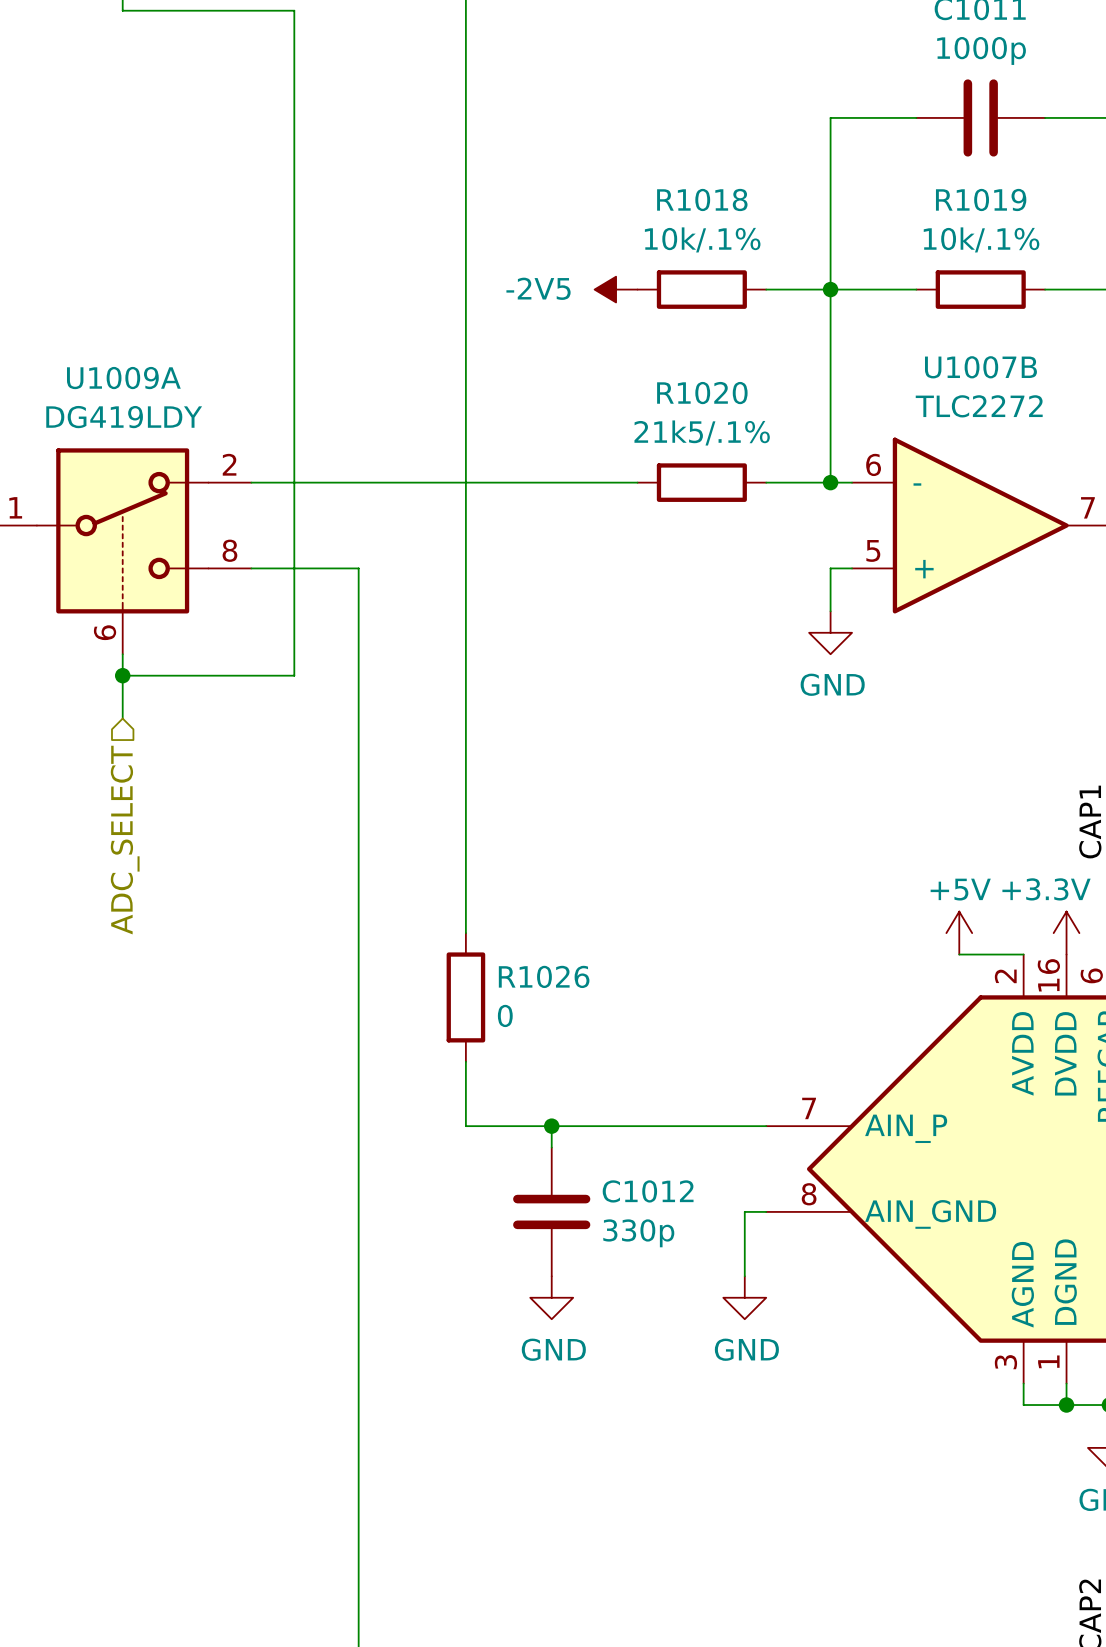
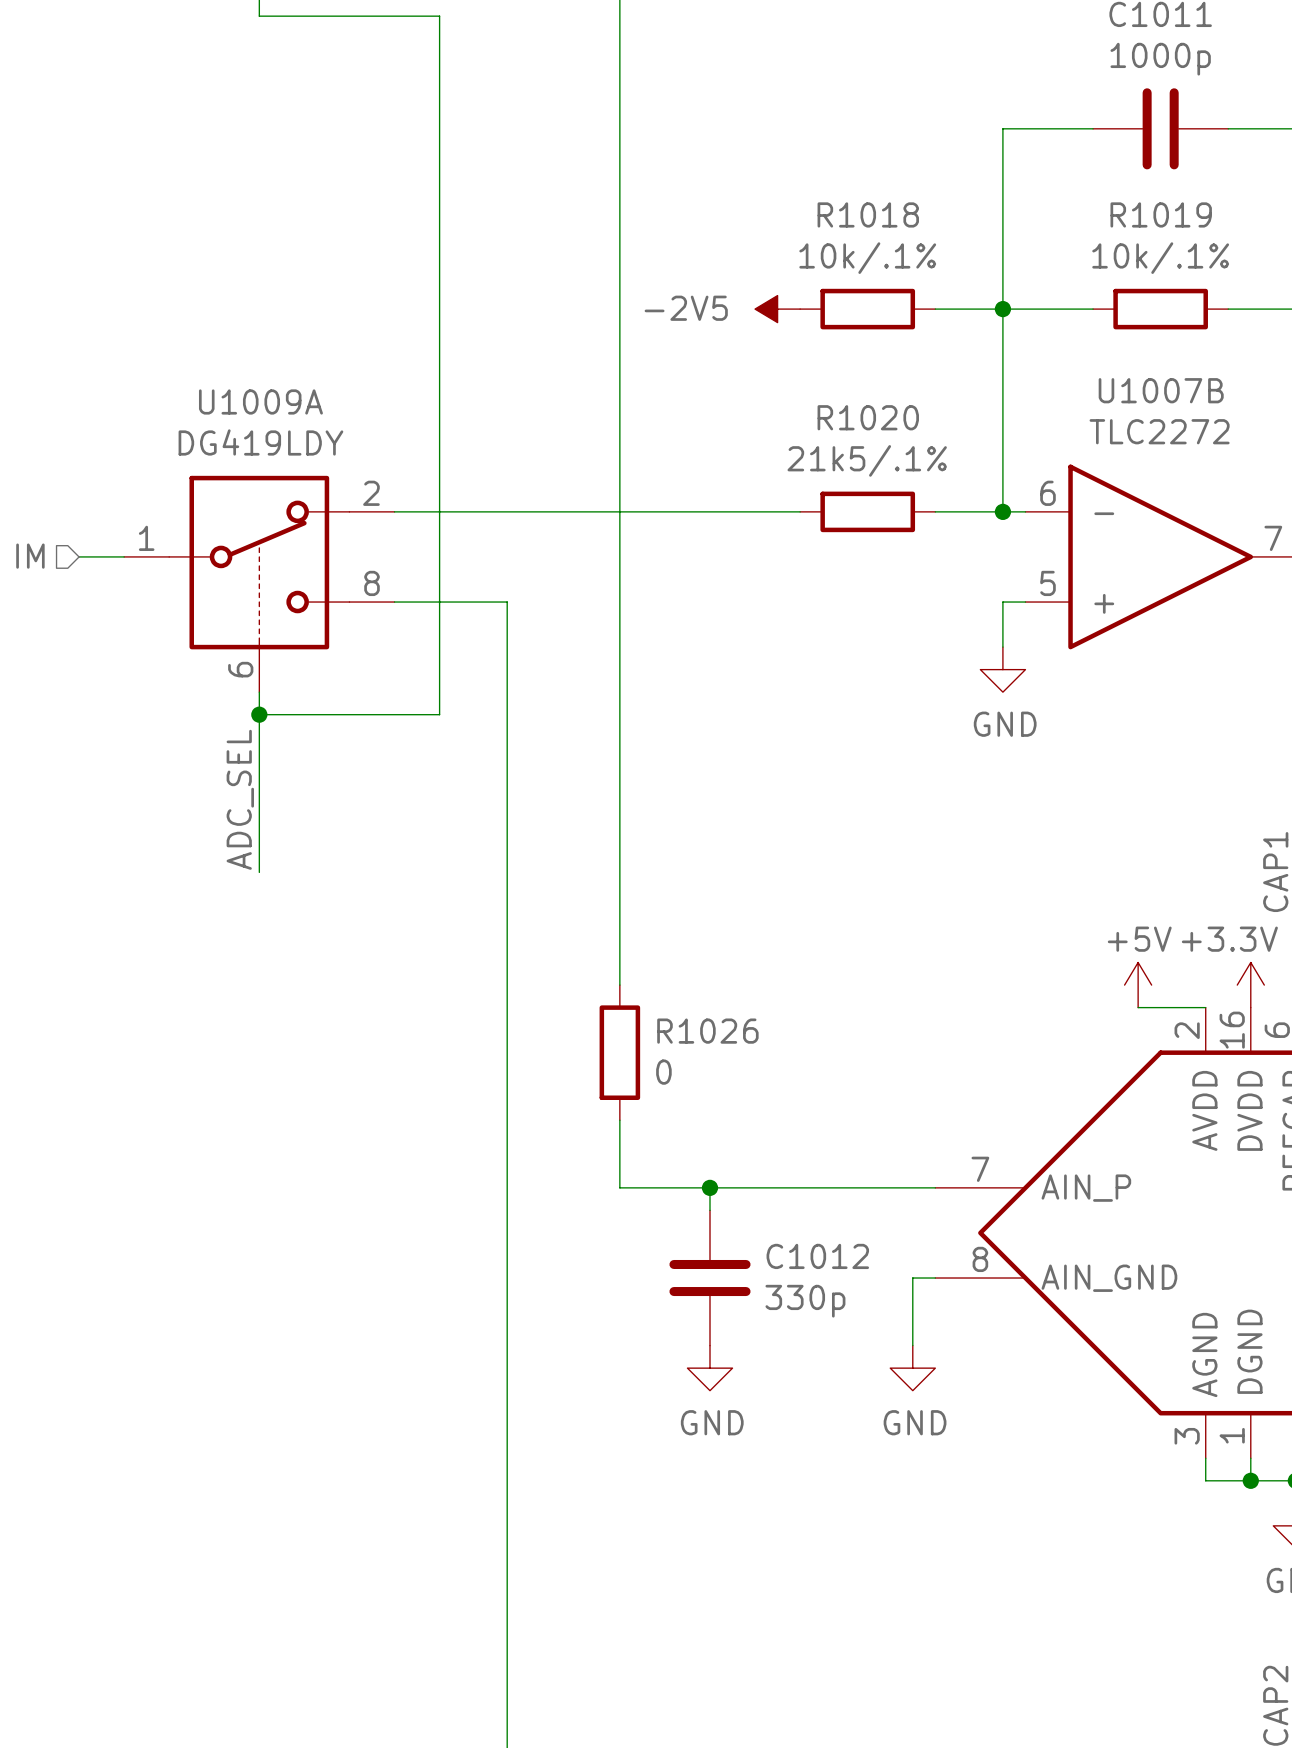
wire: none -> (259, 759) (259, 872)
label: none -> ADC_SEL (240, 799)
hierarchical label: ADC_SELECT (125, 840) -> none

